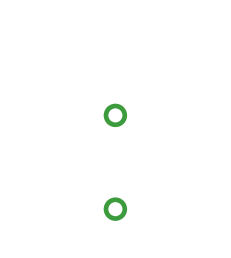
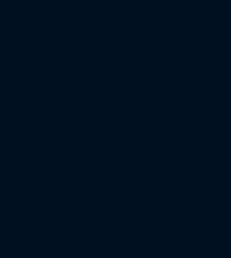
via: (115, 115) -> none
via: (115, 209) -> none

